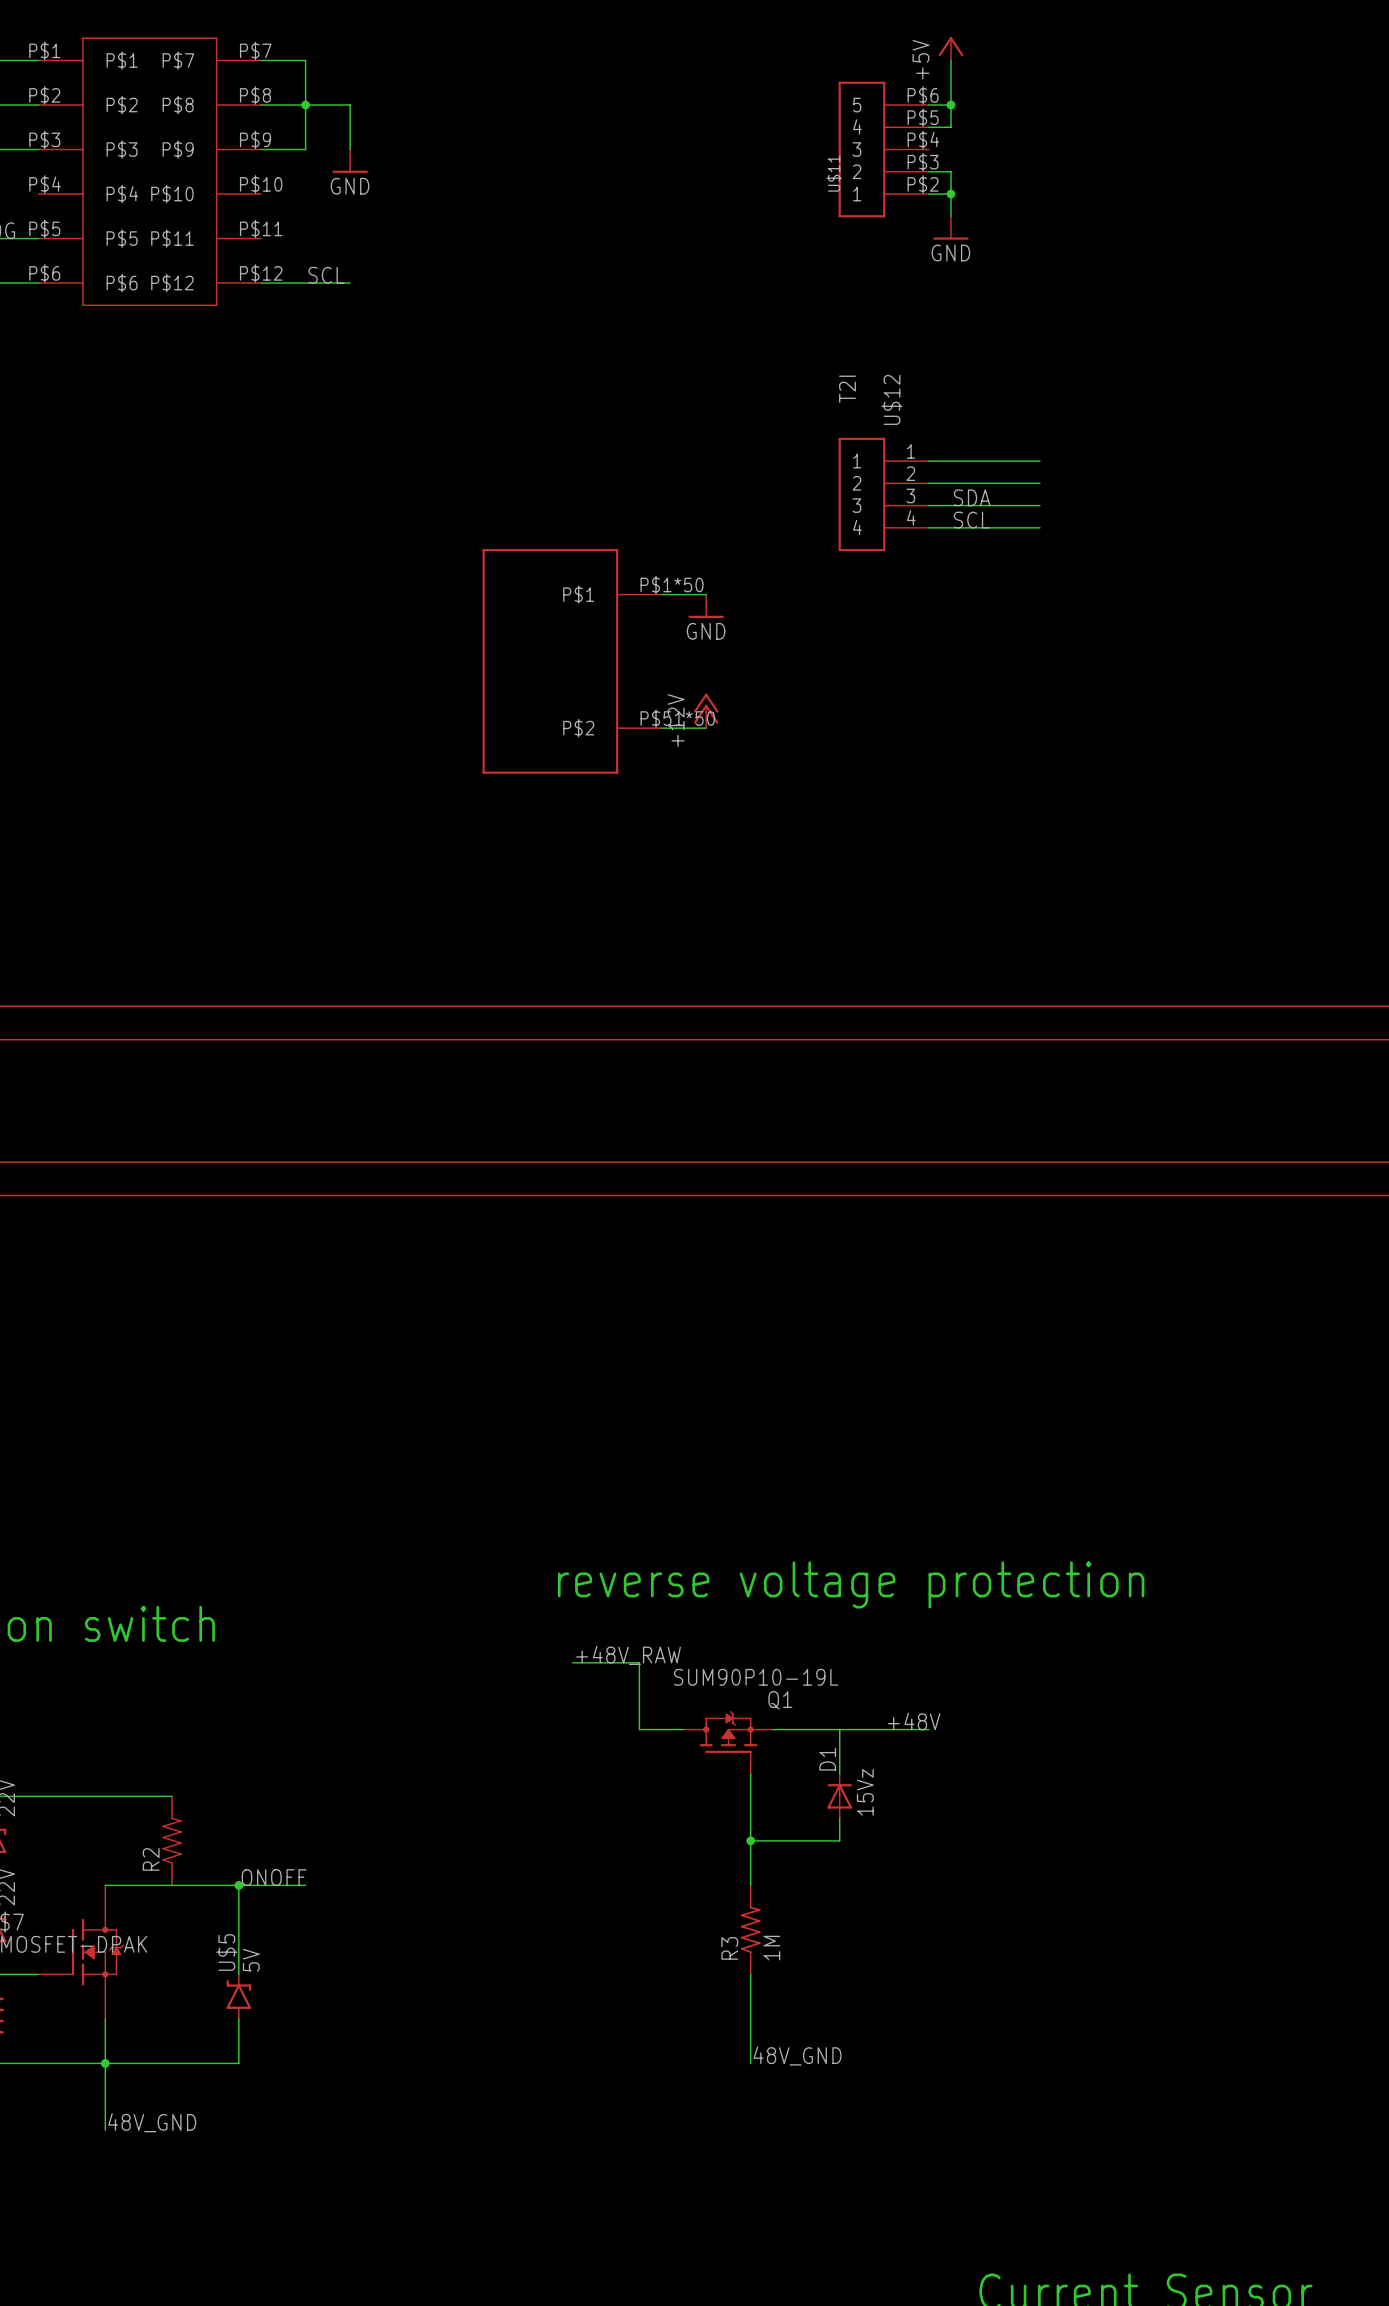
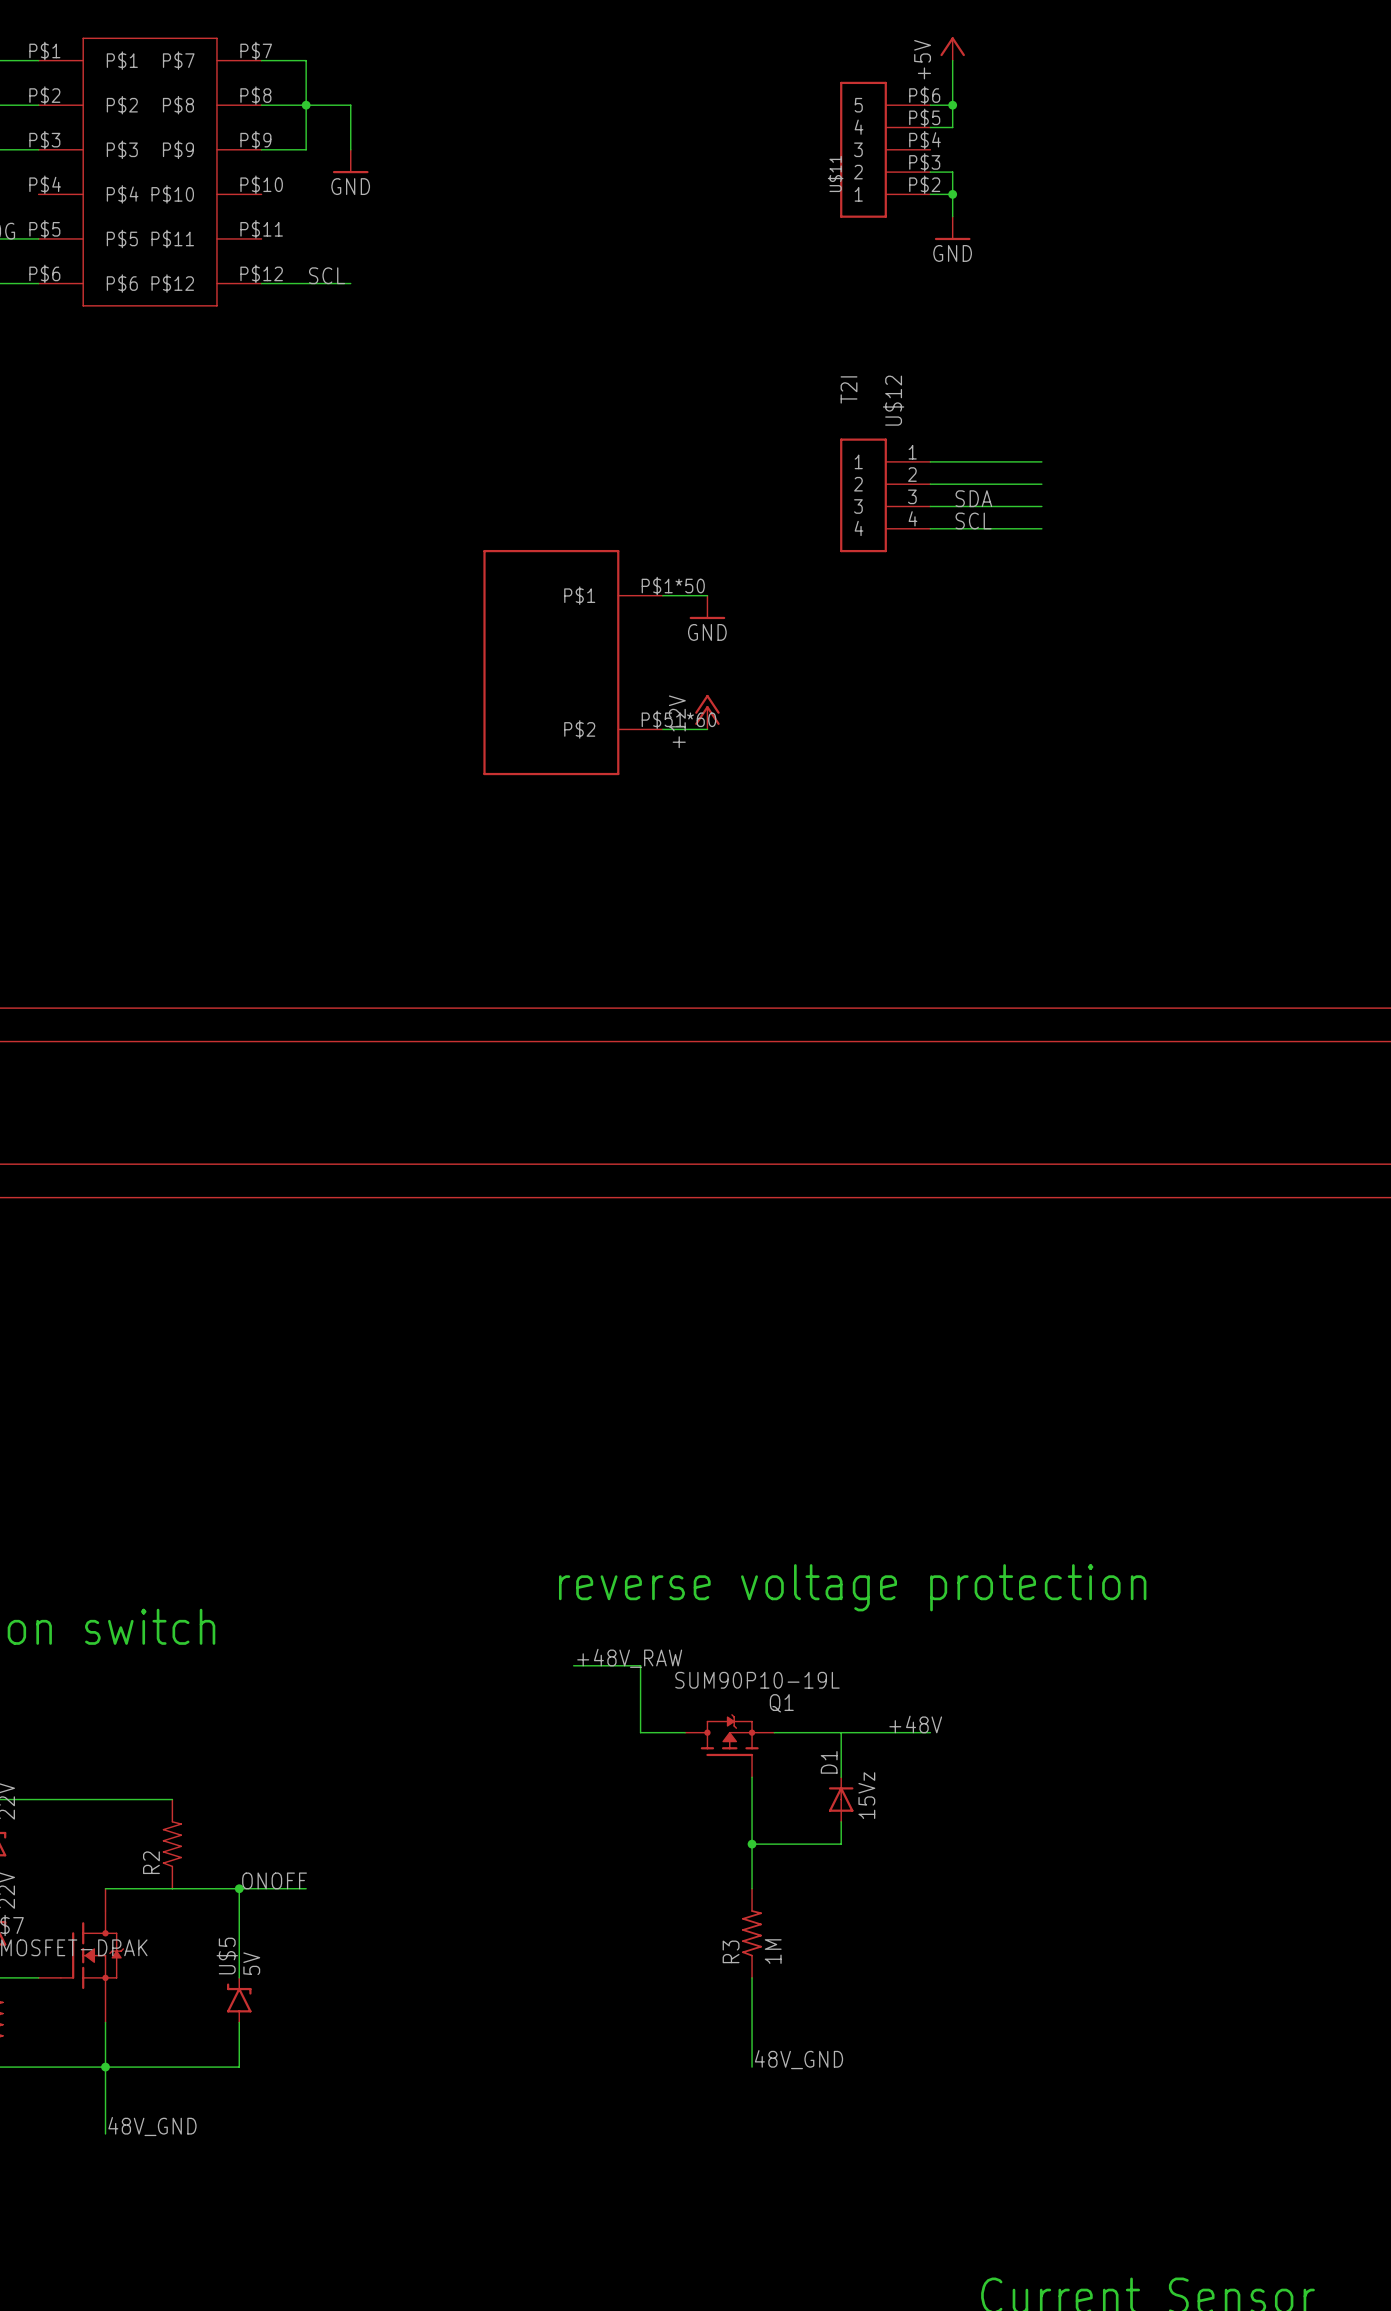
part pin number: P$51*50 (677, 718) -> P$51*60 (678, 719)

